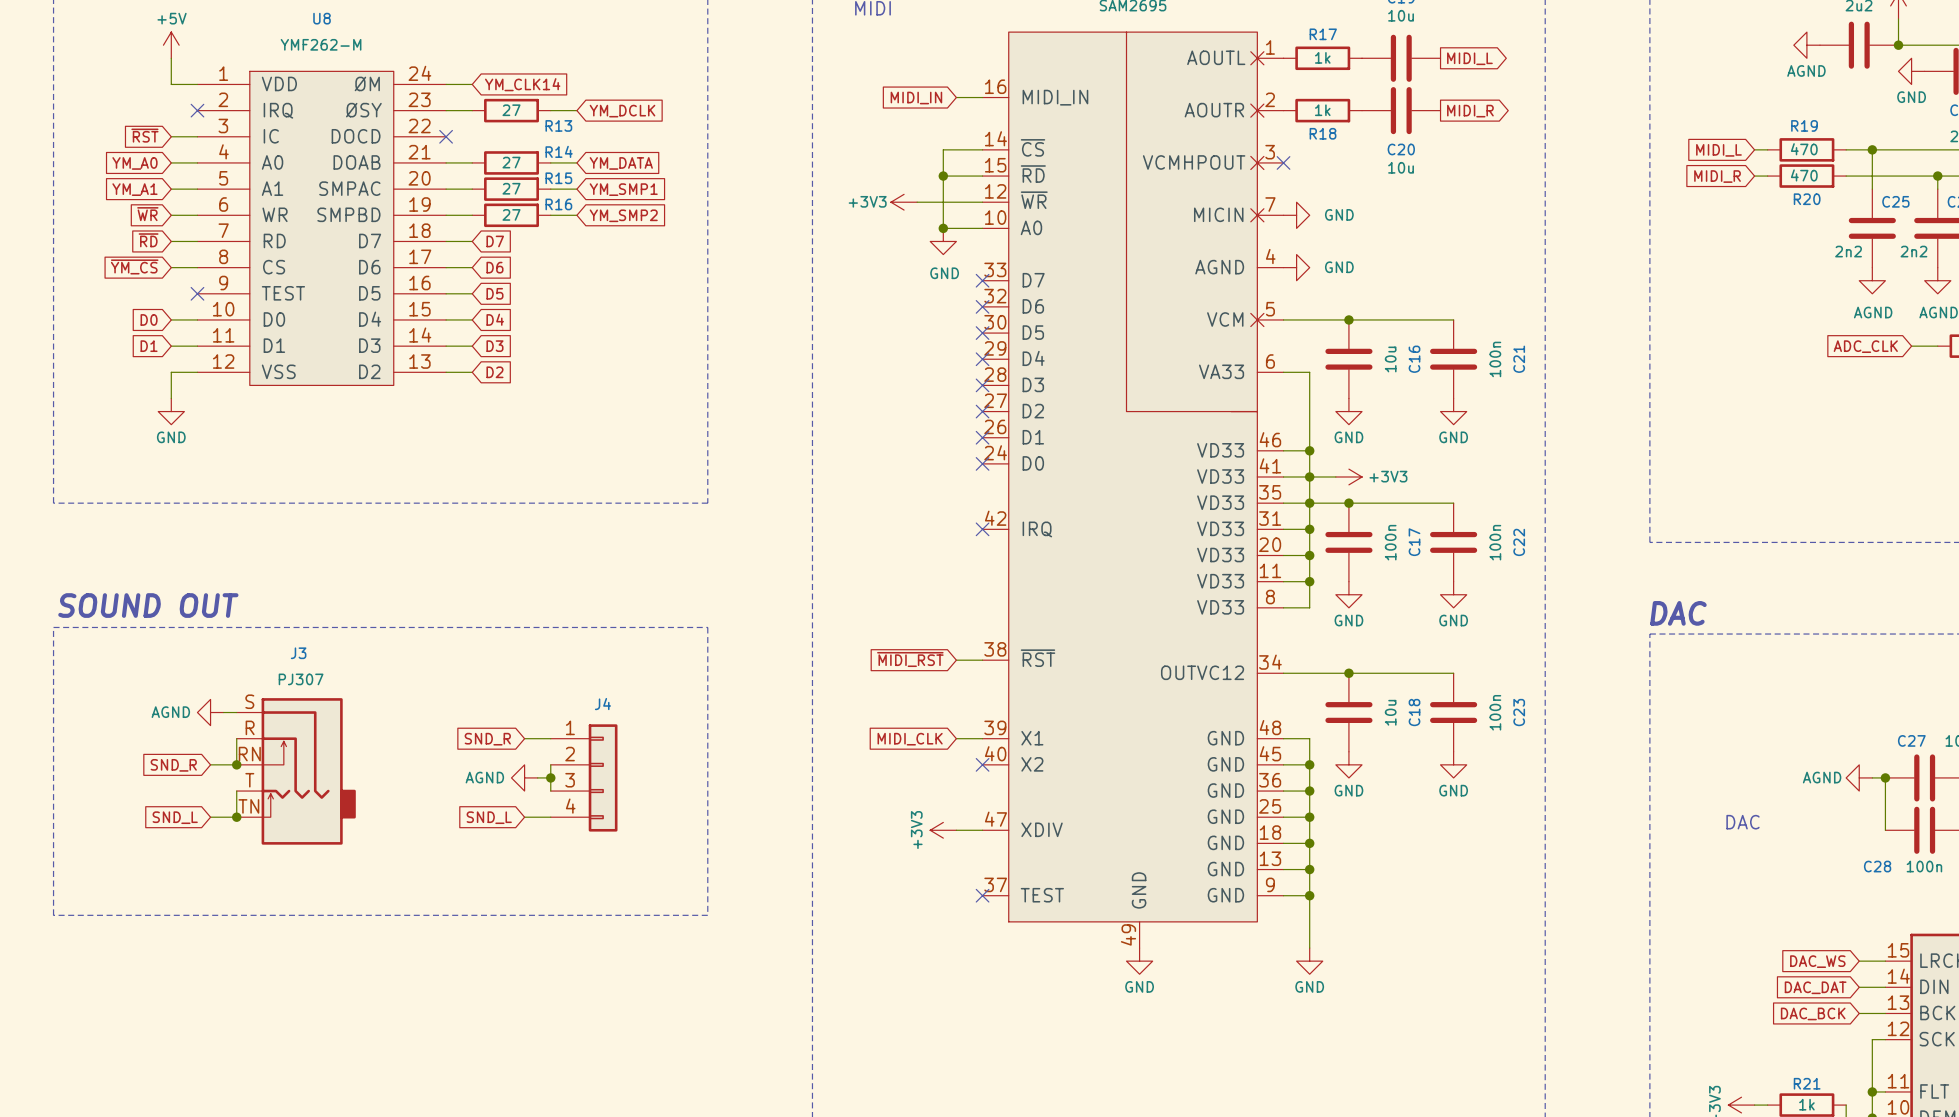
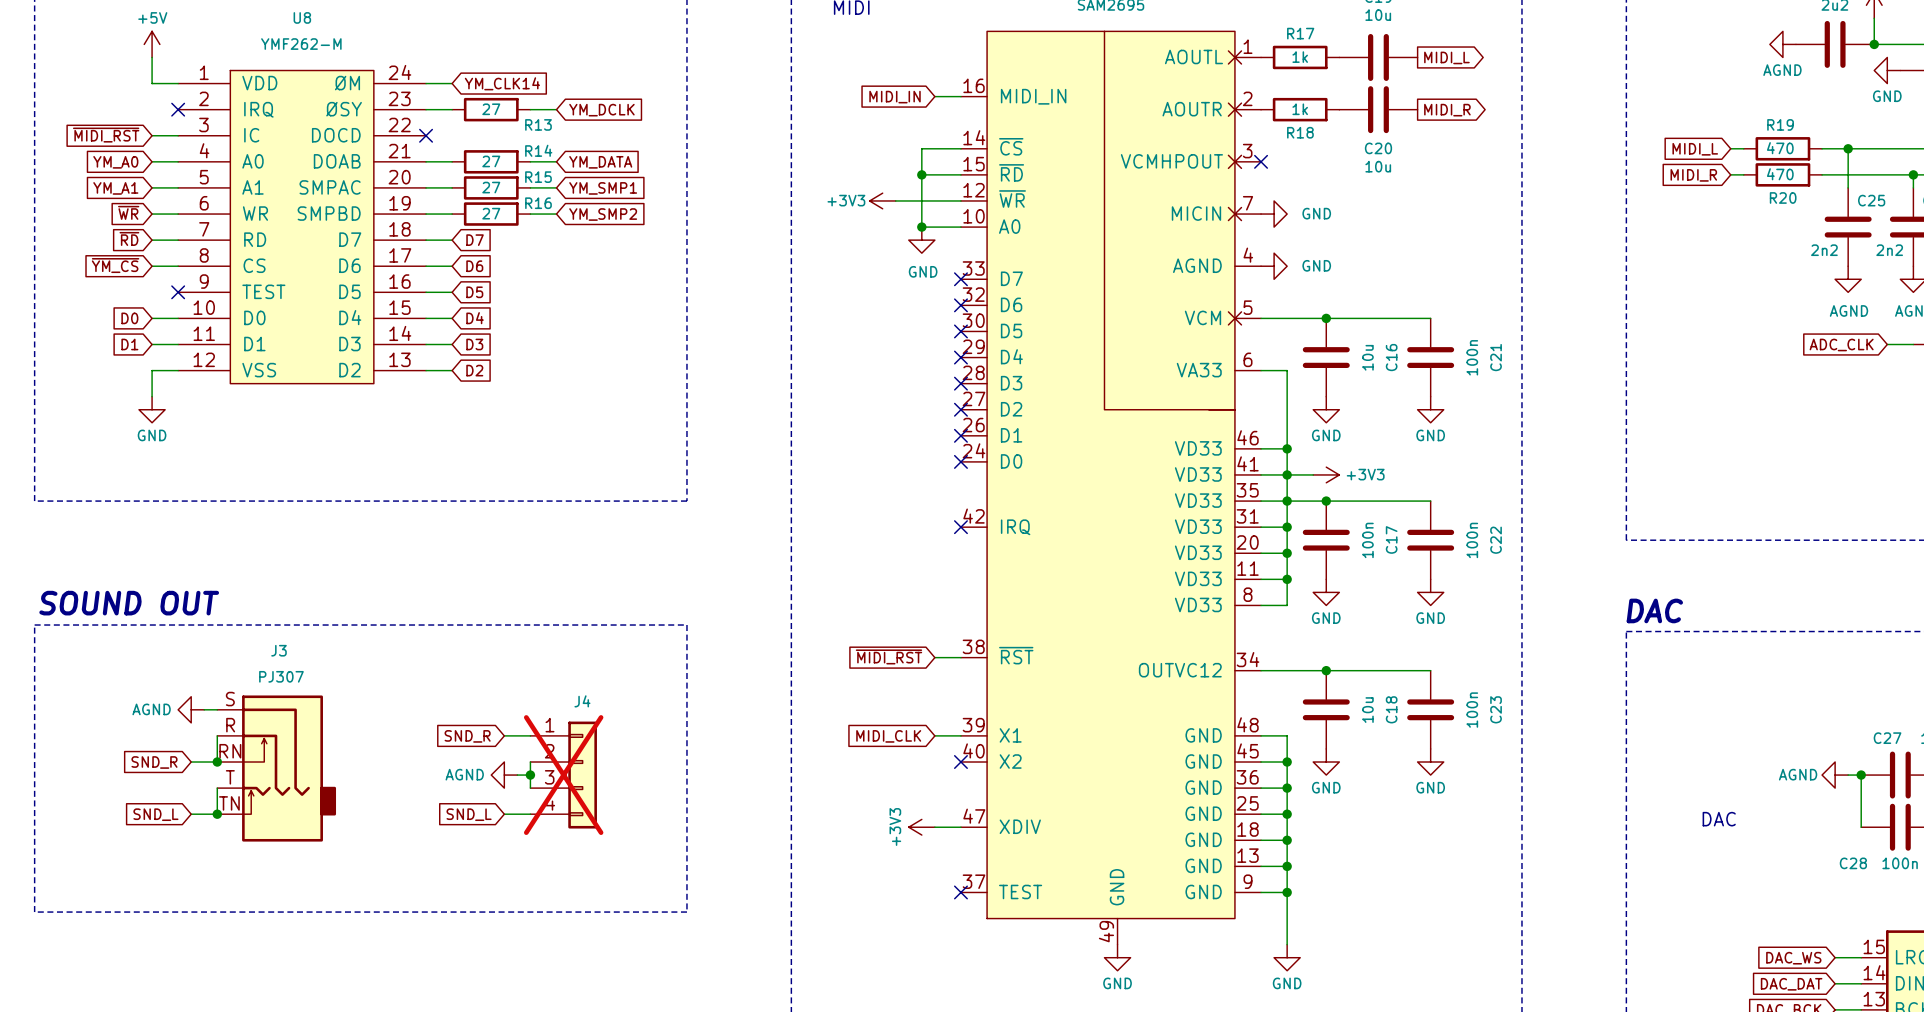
global label: ~{RST} (144, 135) -> ~{MIDI_RST} (106, 135)
J4 do-not-place cross: none -> (563, 775)

